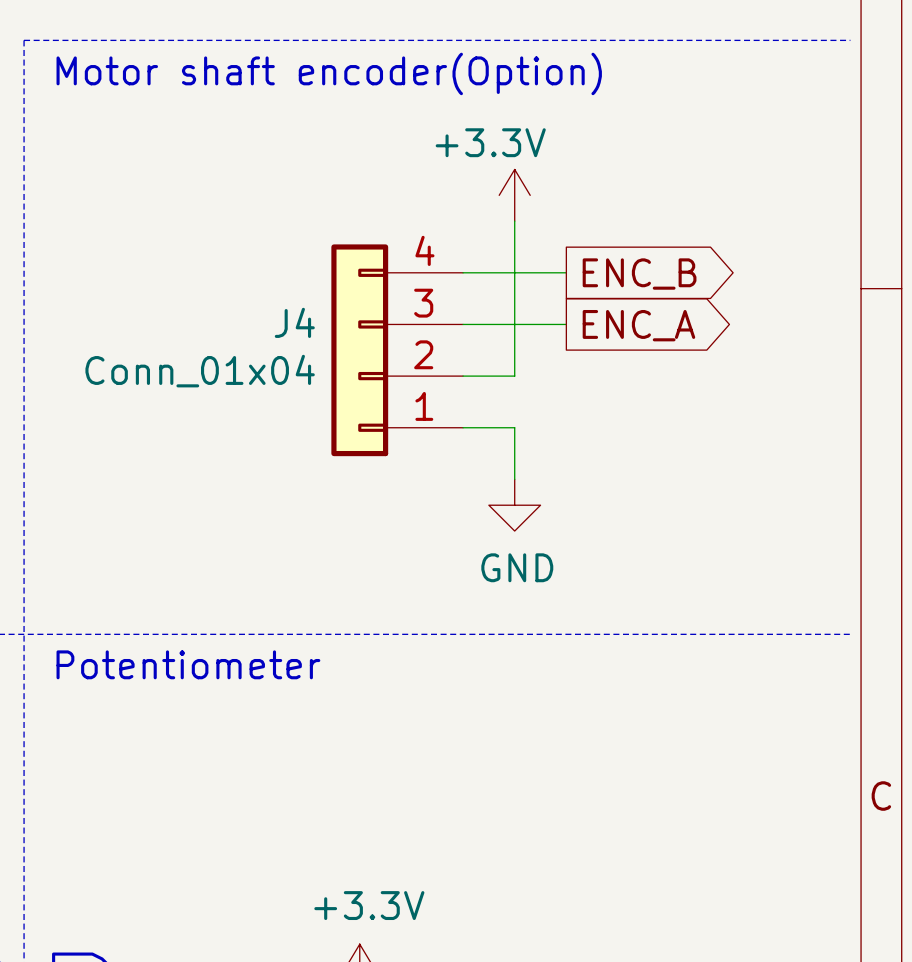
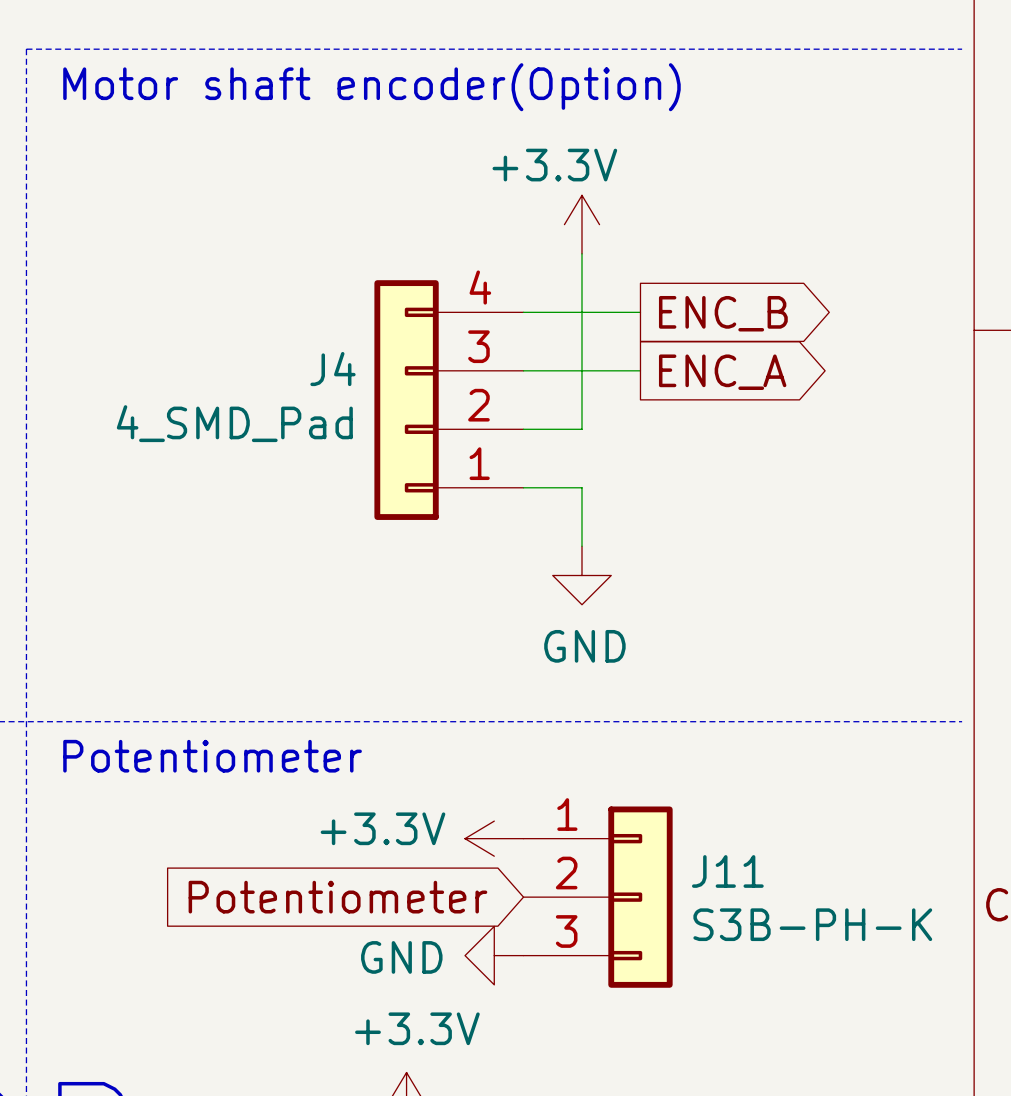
J4 value: Conn_01x04 (200, 371) -> 4_SMD_Pad (234, 423)
power symbol: none -> +3.3V (494, 838)
global label: none -> Potentiometer (337, 897)
J11: none -> S3B-PH-K (598, 897)
power symbol: none -> GND (494, 955)

